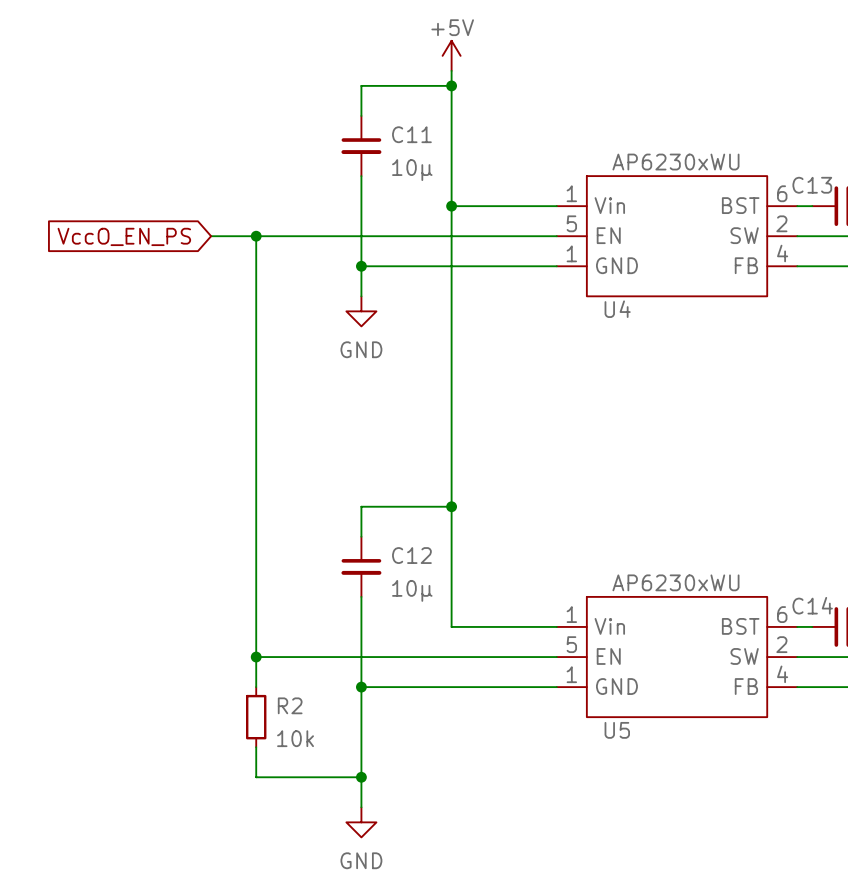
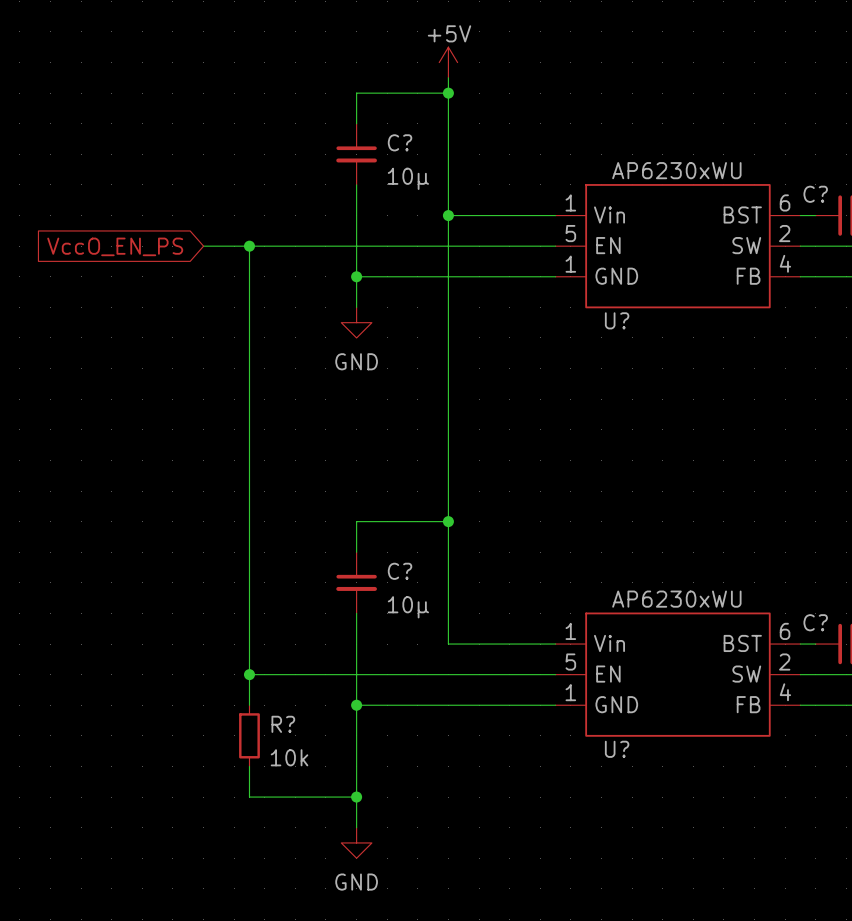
C11 name: C11 (411, 134) -> C? (400, 142)
C13 name: C13 (812, 185) -> C? (815, 194)
U4 name: U4 (617, 309) -> U? (617, 320)
C12 name: C12 (411, 555) -> C? (400, 571)
C14 name: C14 (812, 605) -> C? (815, 622)
R2 name: R2 (290, 705) -> R? (283, 724)
U5 name: U5 (617, 730) -> U? (617, 749)

